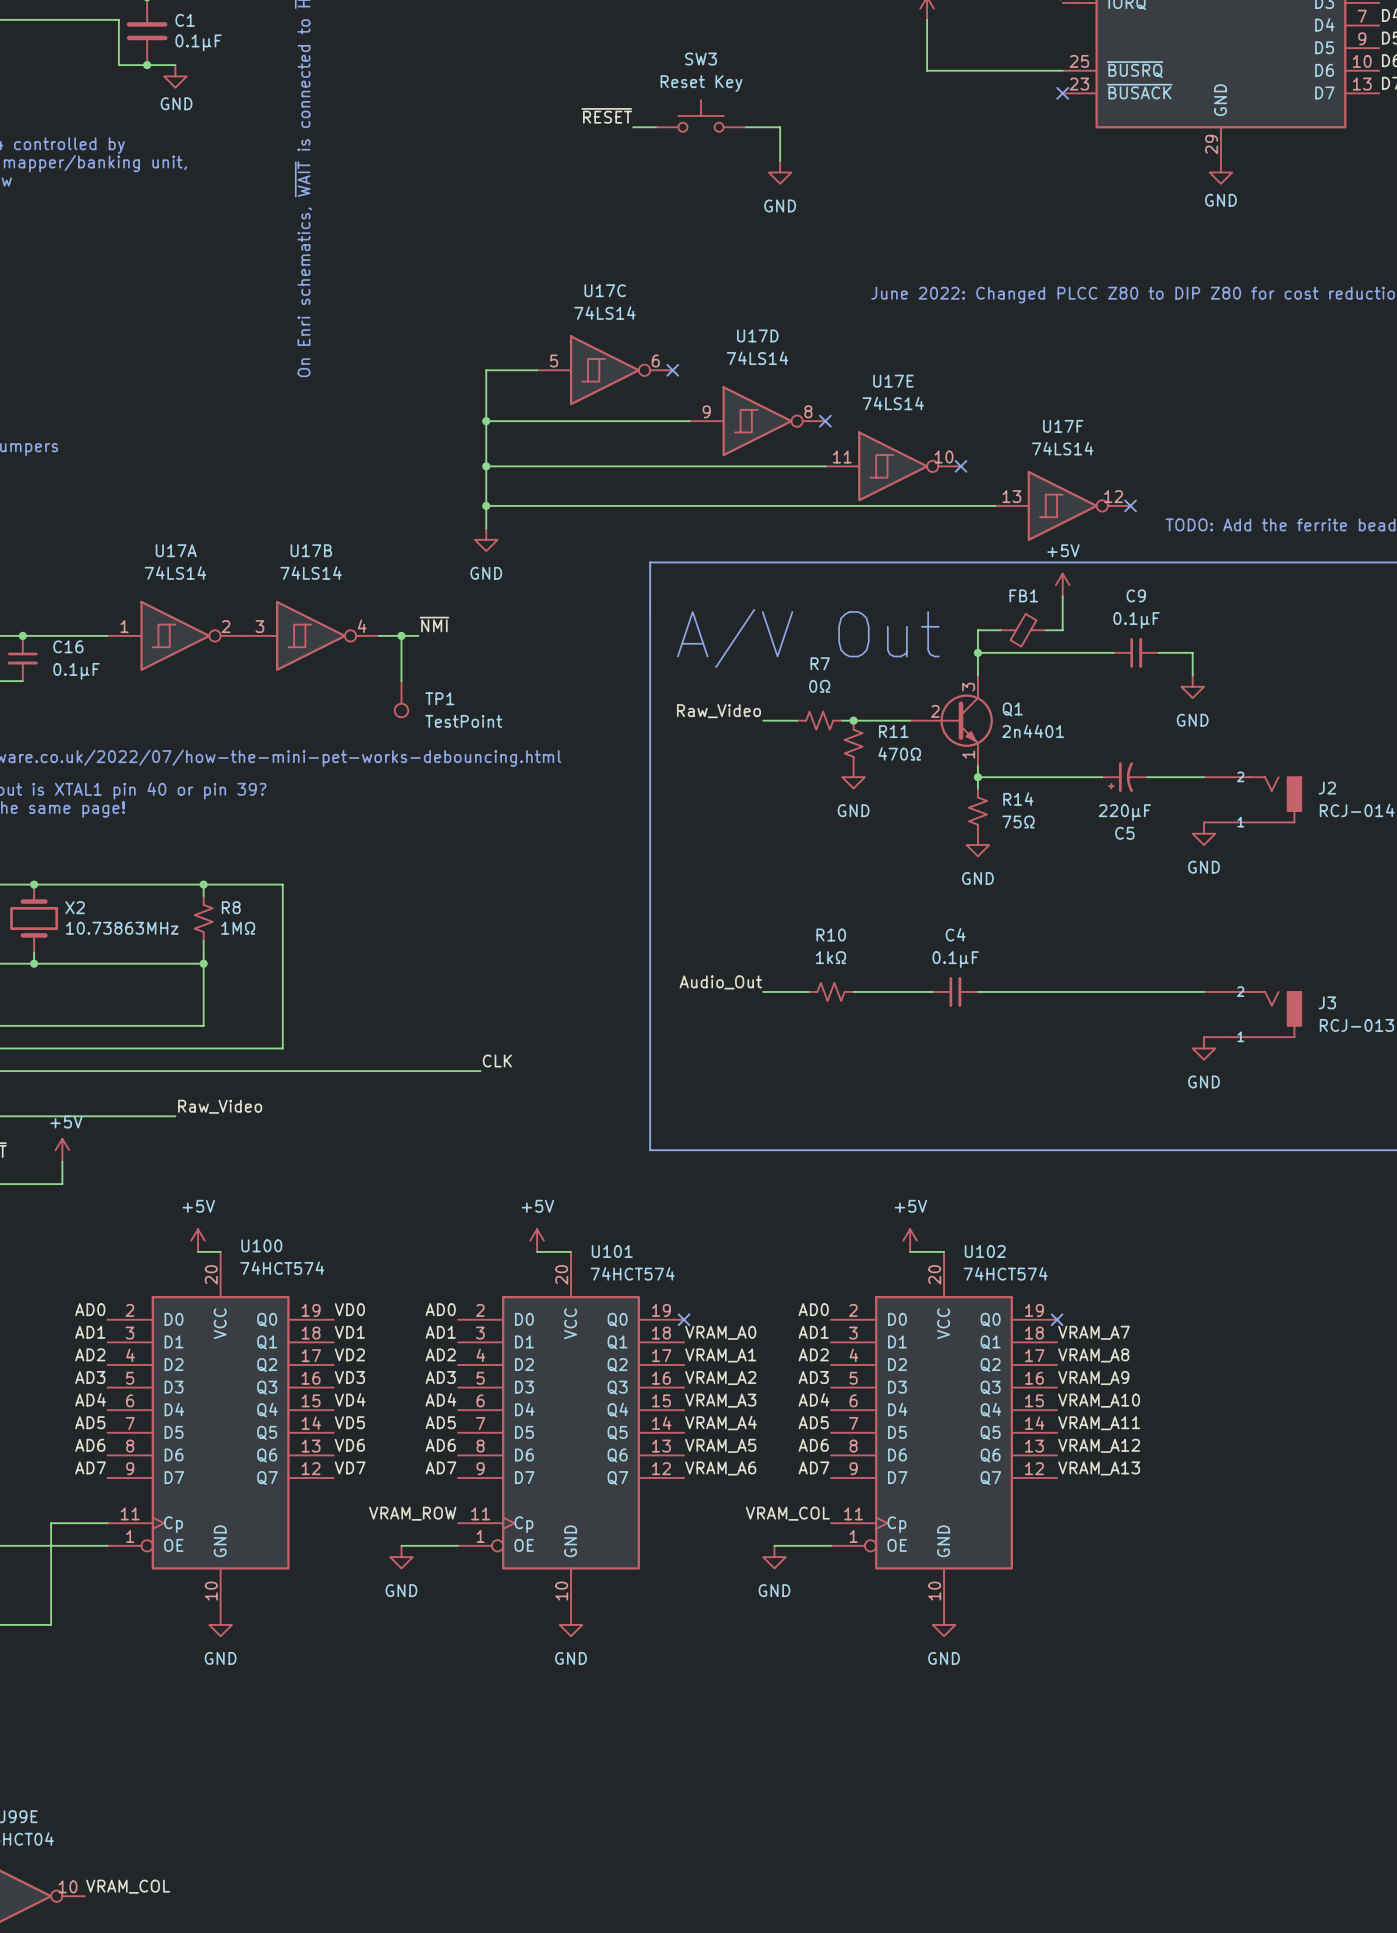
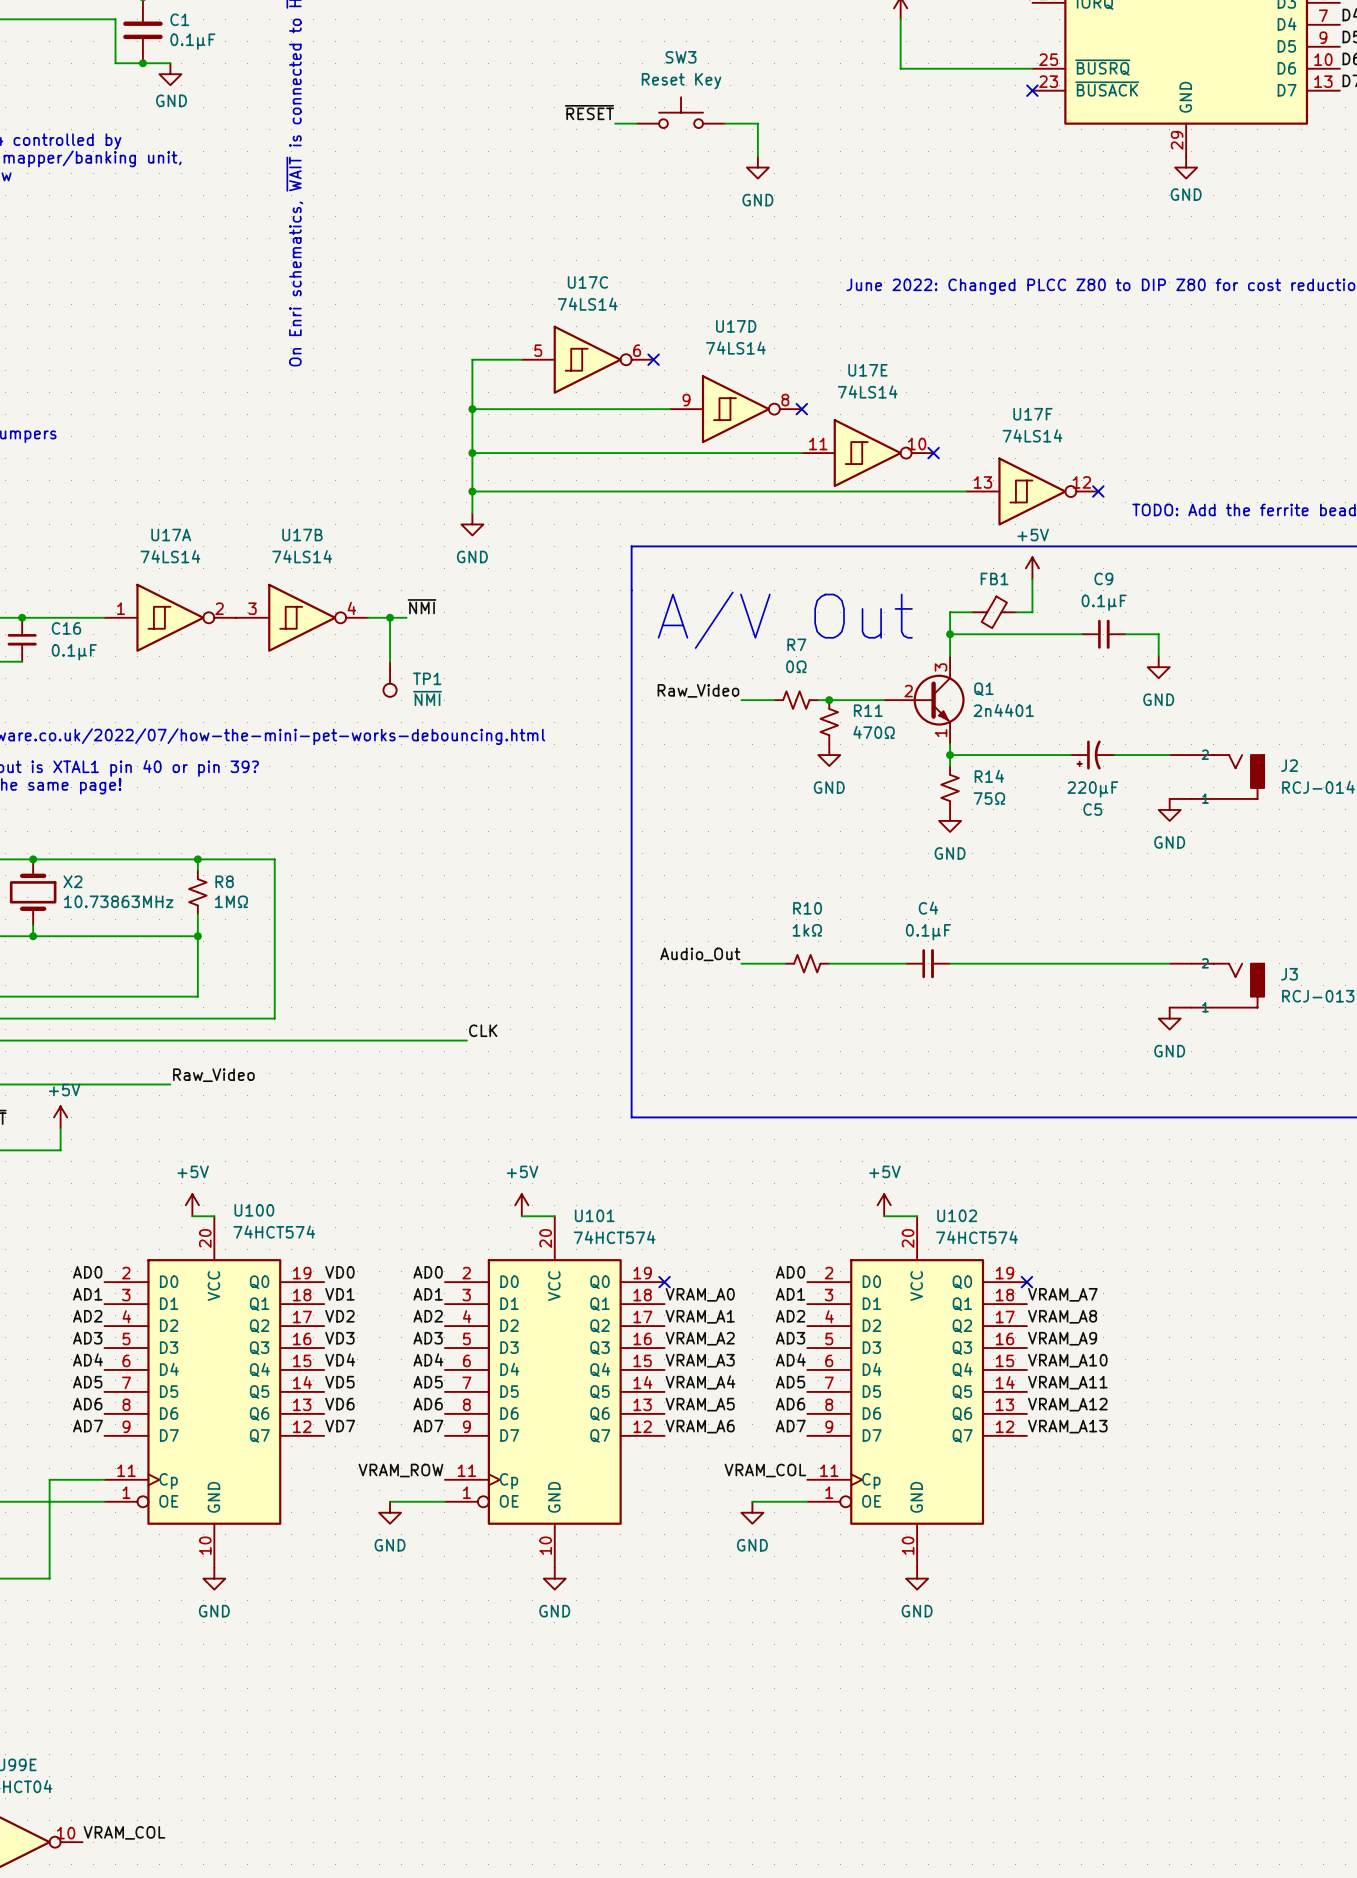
TP1 value: TestPoint (463, 721) -> ~{NMI} (427, 698)

